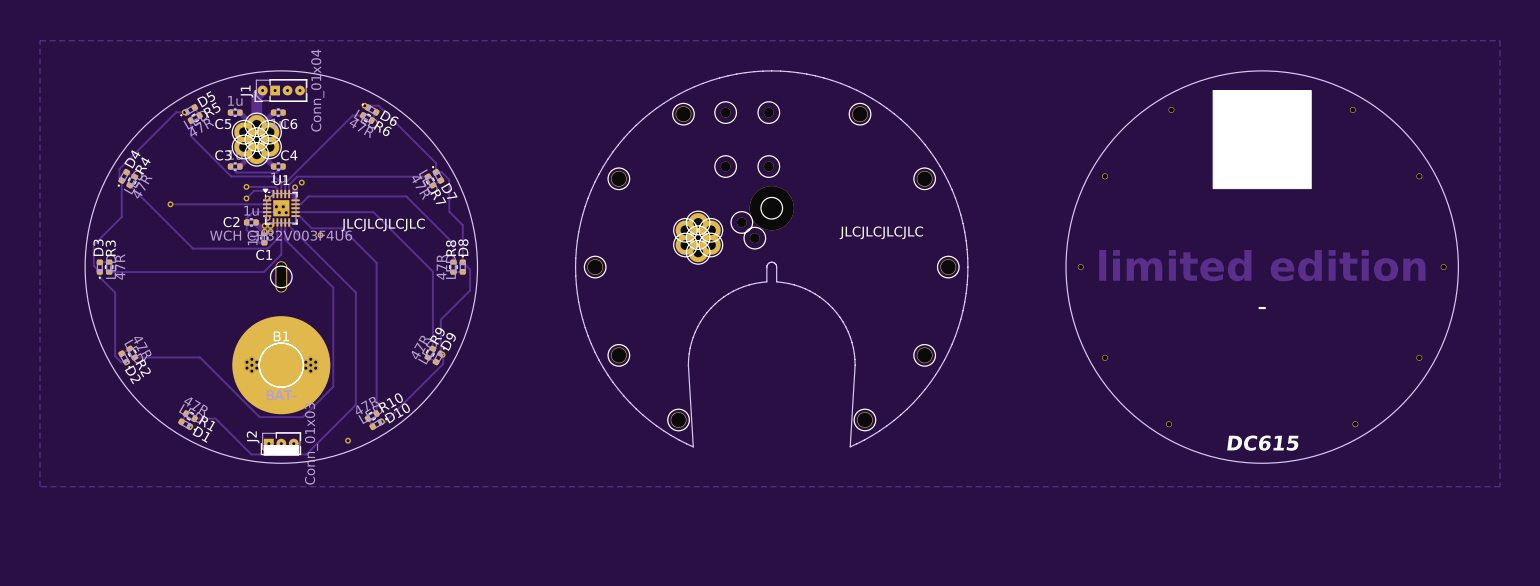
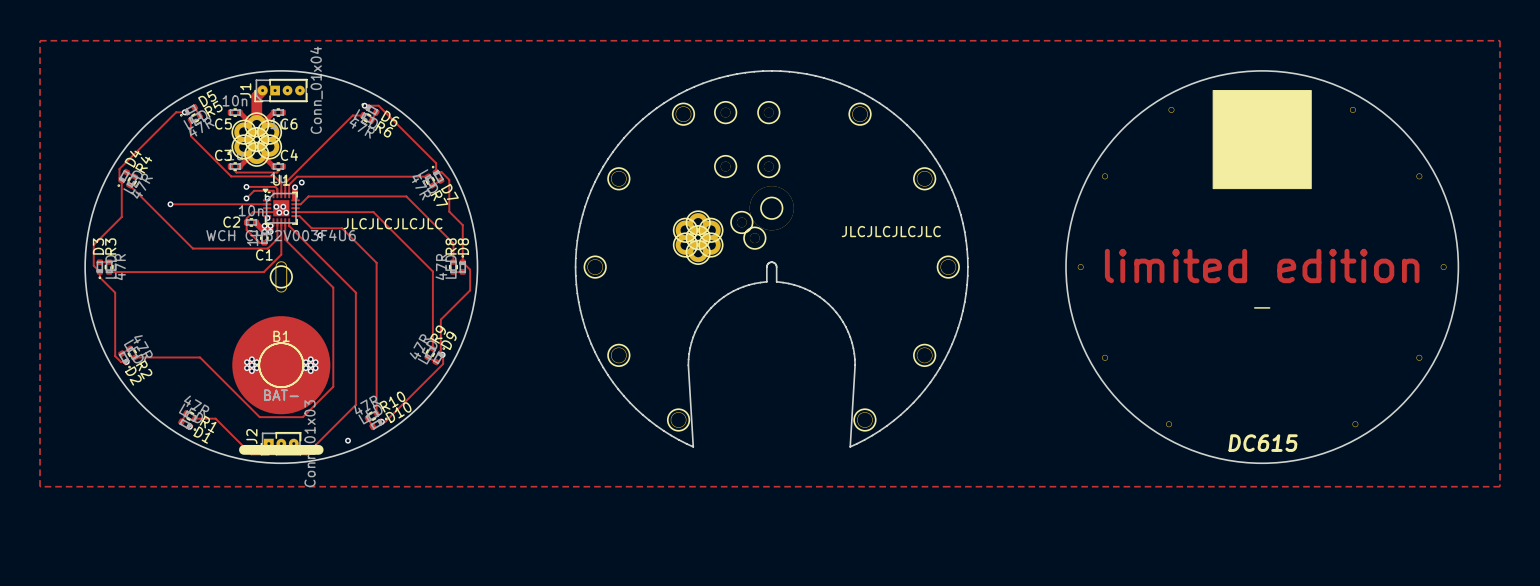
C5 value: 1u (235, 100) -> 10n (234, 100)
C2 value: 1u (251, 210) -> 10n (251, 210)

